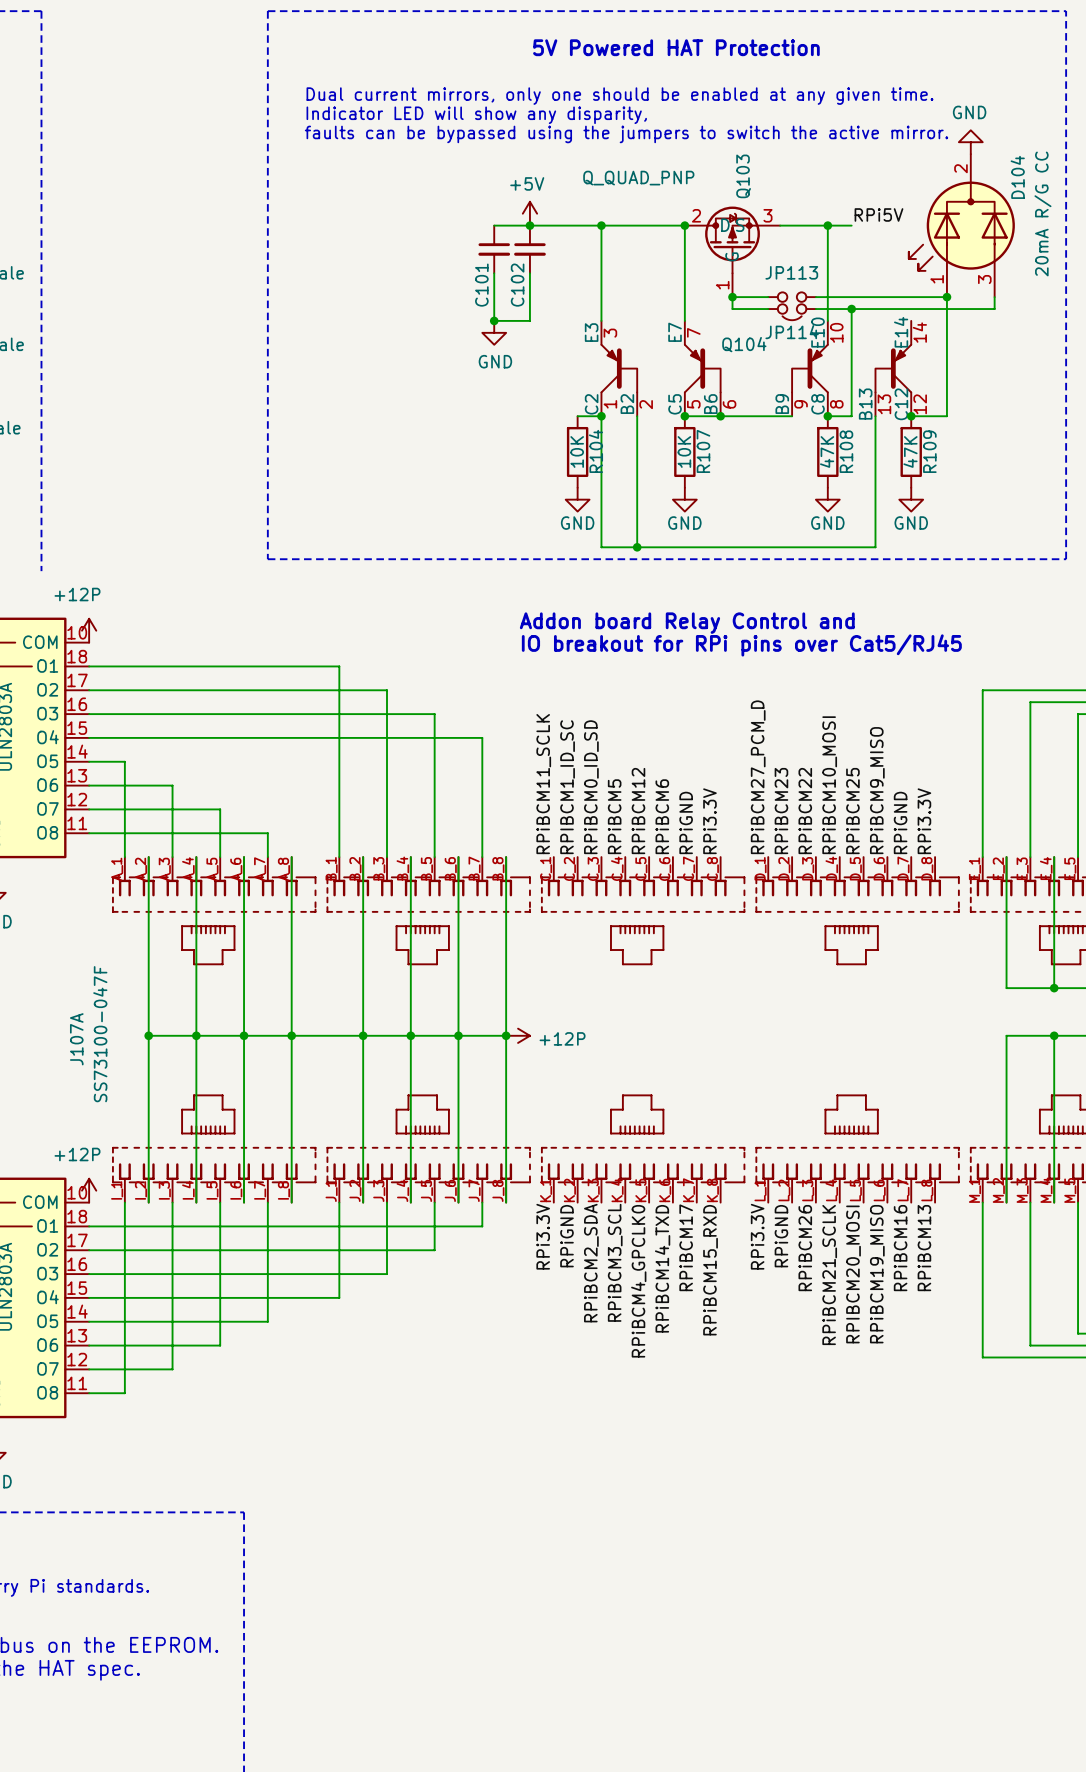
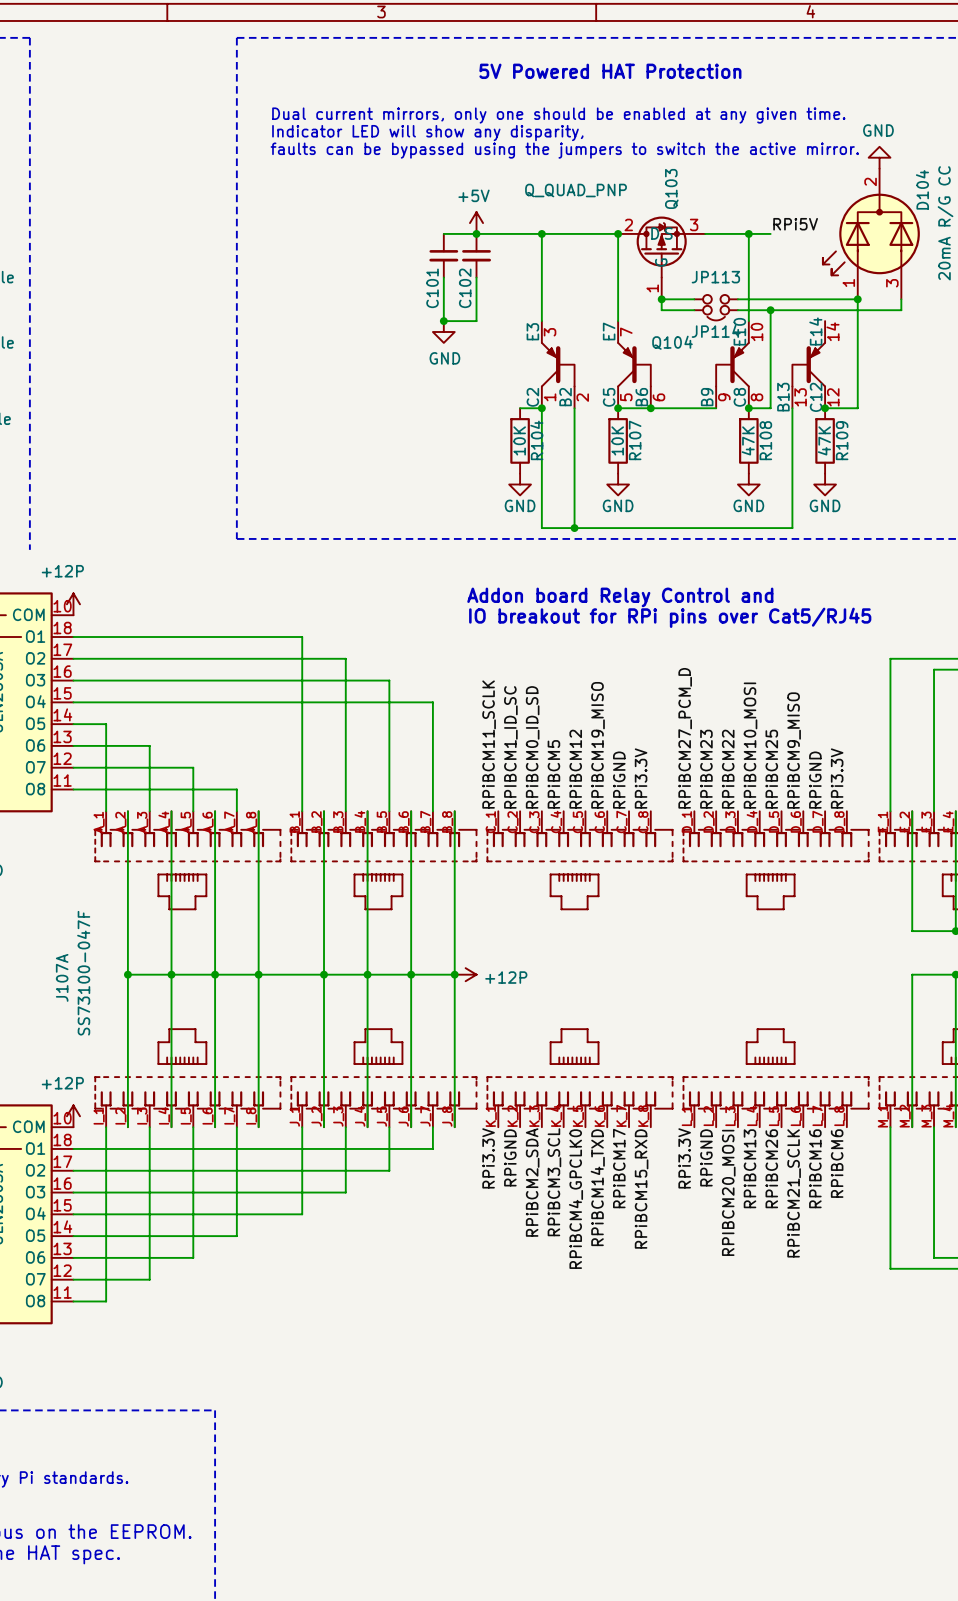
label: RPiBCM6 (662, 816) -> RPiBCM19_MISO (598, 745)
label: RPiBCM26 (805, 1248) -> RPIBCM20_MOSI (728, 1192)
label: RPiBCM13 (924, 1248) -> RPiBCM6 (837, 1163)
label: RPIBCM20_MOSI (853, 1274) -> RPiBCM26 (771, 1168)
label: RPiBCM19_MISO (877, 1274) -> RPiBCM21_SCLK (794, 1193)
label: RPiBCM21_SCLK (829, 1275) -> RPiBCM13 (750, 1168)

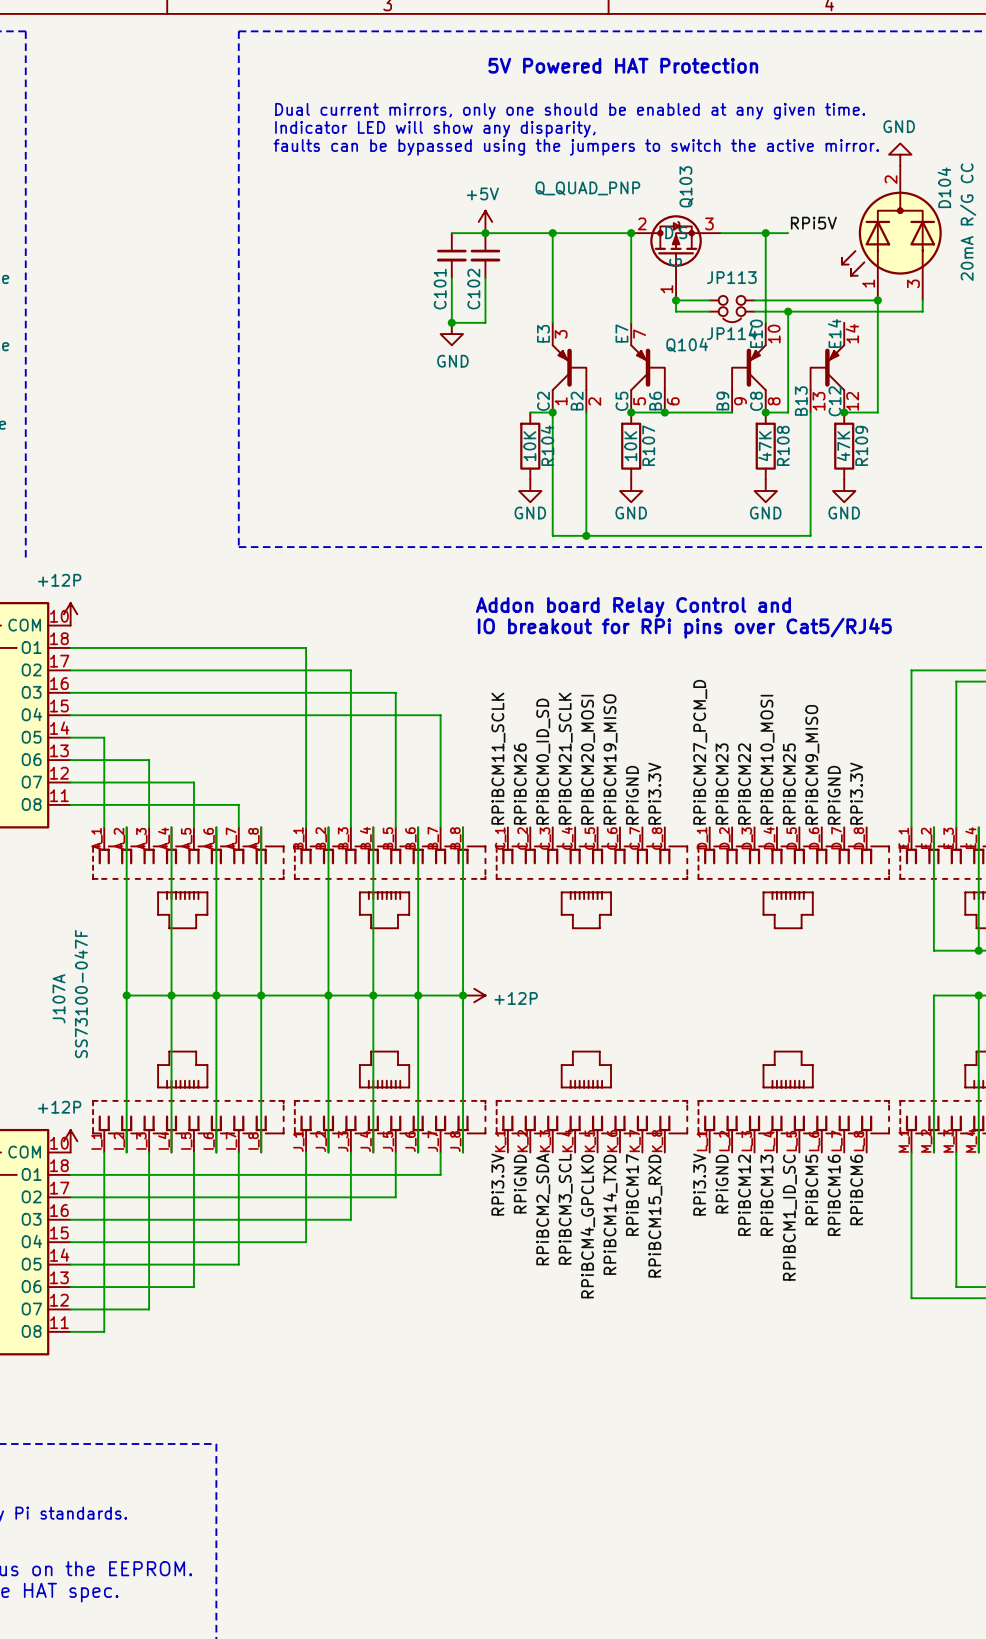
label: RPIBCM1_ID_SC (510, 747) -> RPiBCM26 (520, 784)
label: RPiBCM12 (575, 769) -> RPIBCM20_MOSI (588, 759)
label: RPiBCM5 (553, 774) -> RPiBCM21_SCLK (565, 758)
label: RPiBCM26 (771, 1168) -> RPIBCM1_ID_SC (789, 1217)
label: RPIBCM20_MOSI (728, 1192) -> RPiBCM12 (744, 1195)
label: RPiBCM21_SCLK (794, 1193) -> RPiBCM5 (811, 1189)

